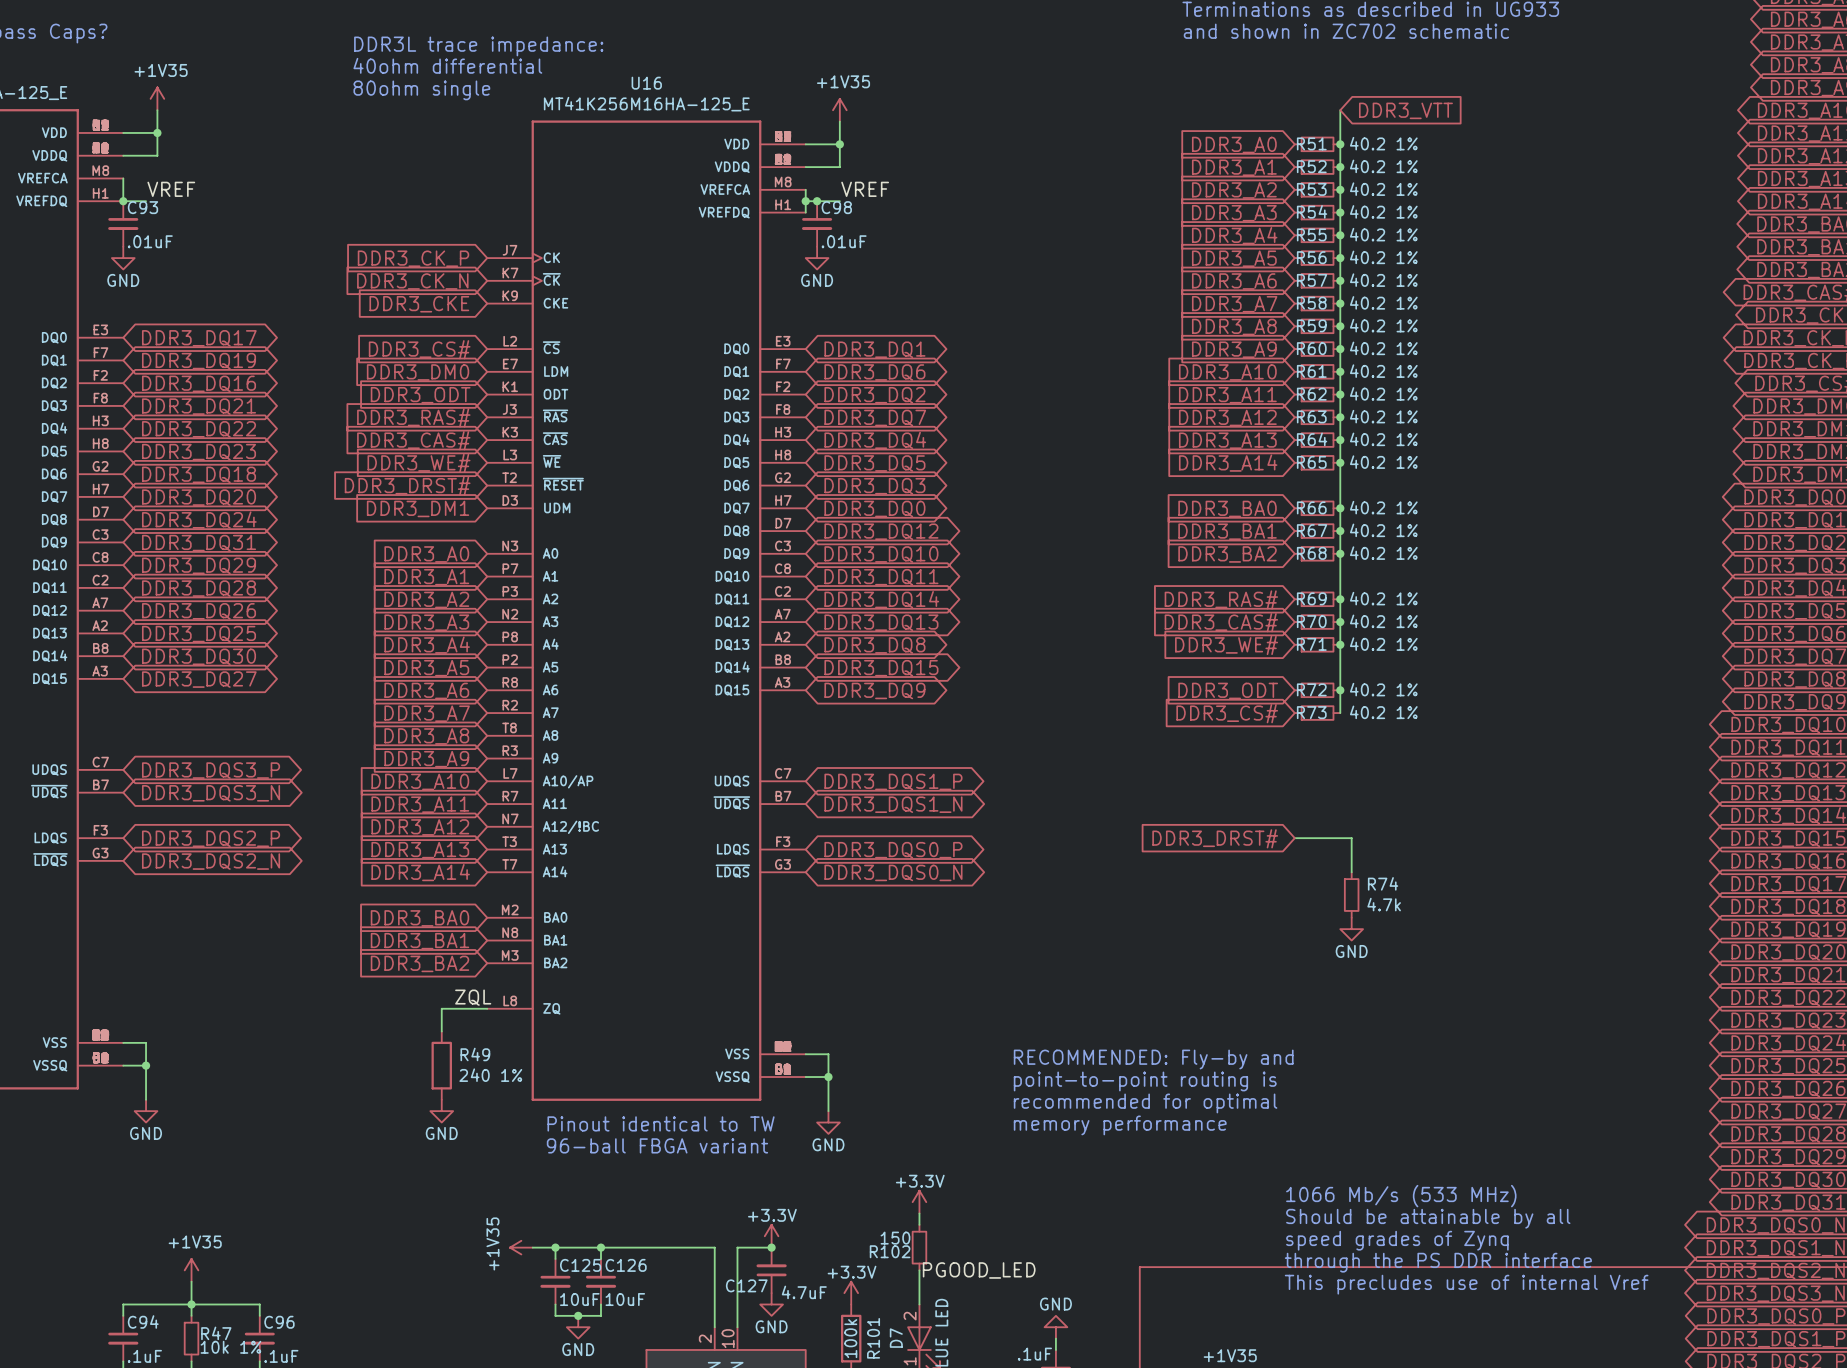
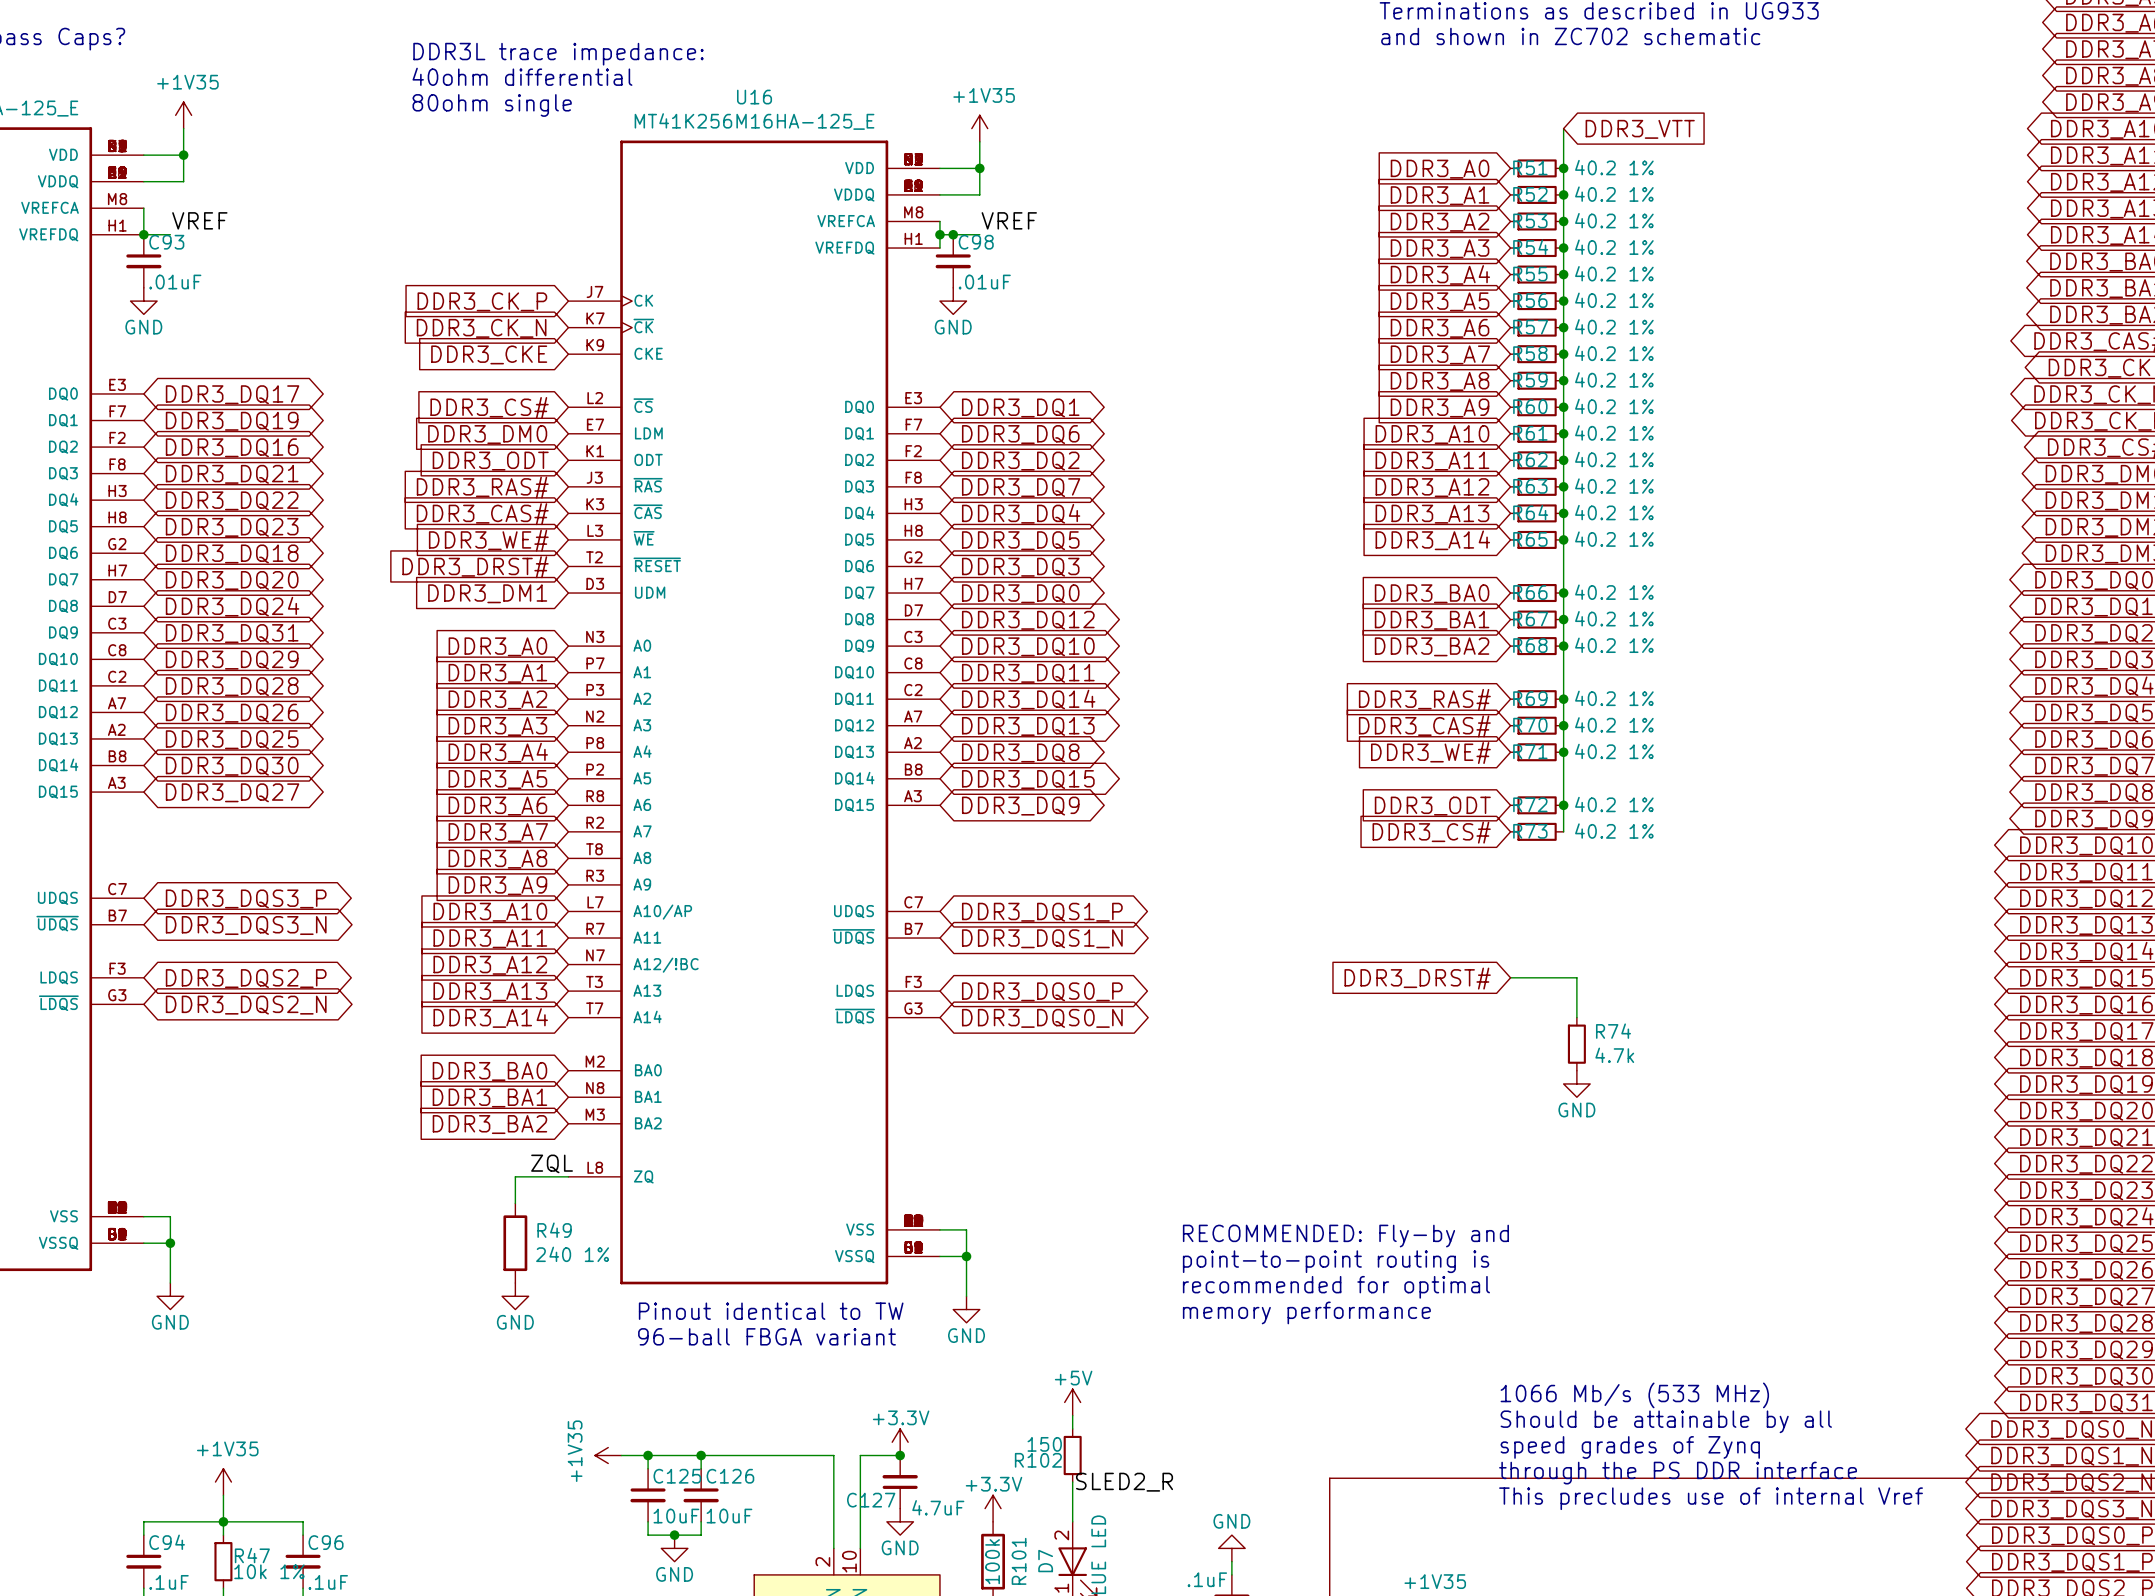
power symbol: +3.3V (919, 1202) -> +5V (1072, 1402)
label: PGOOD_LED (979, 1270) -> SLED2_R (1124, 1482)

